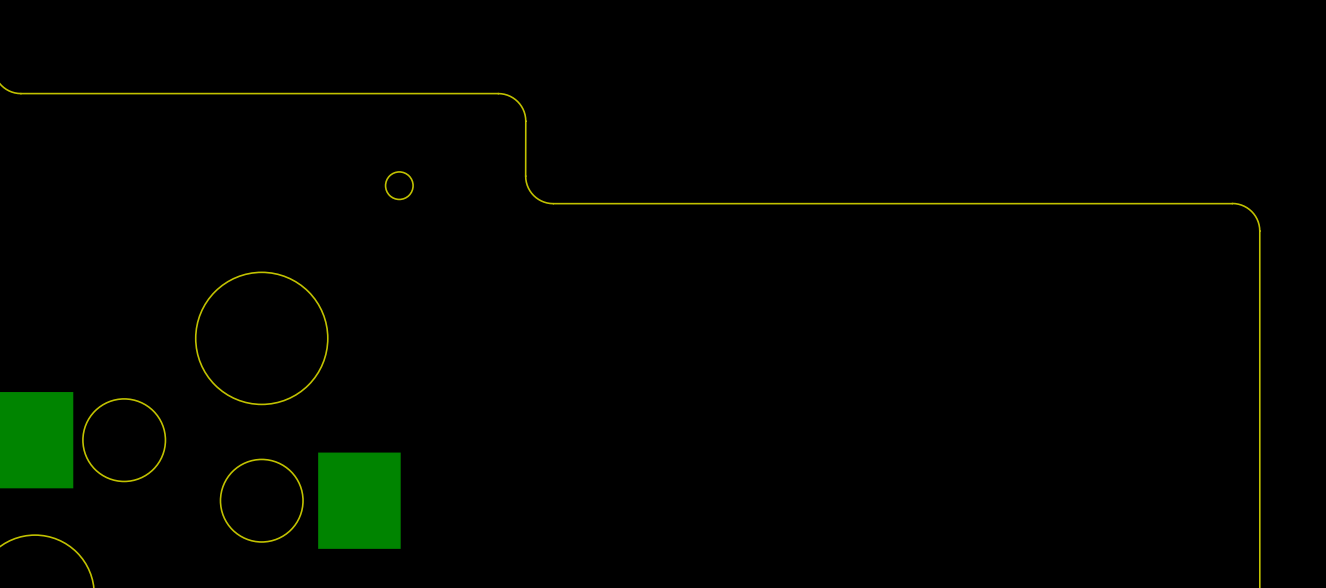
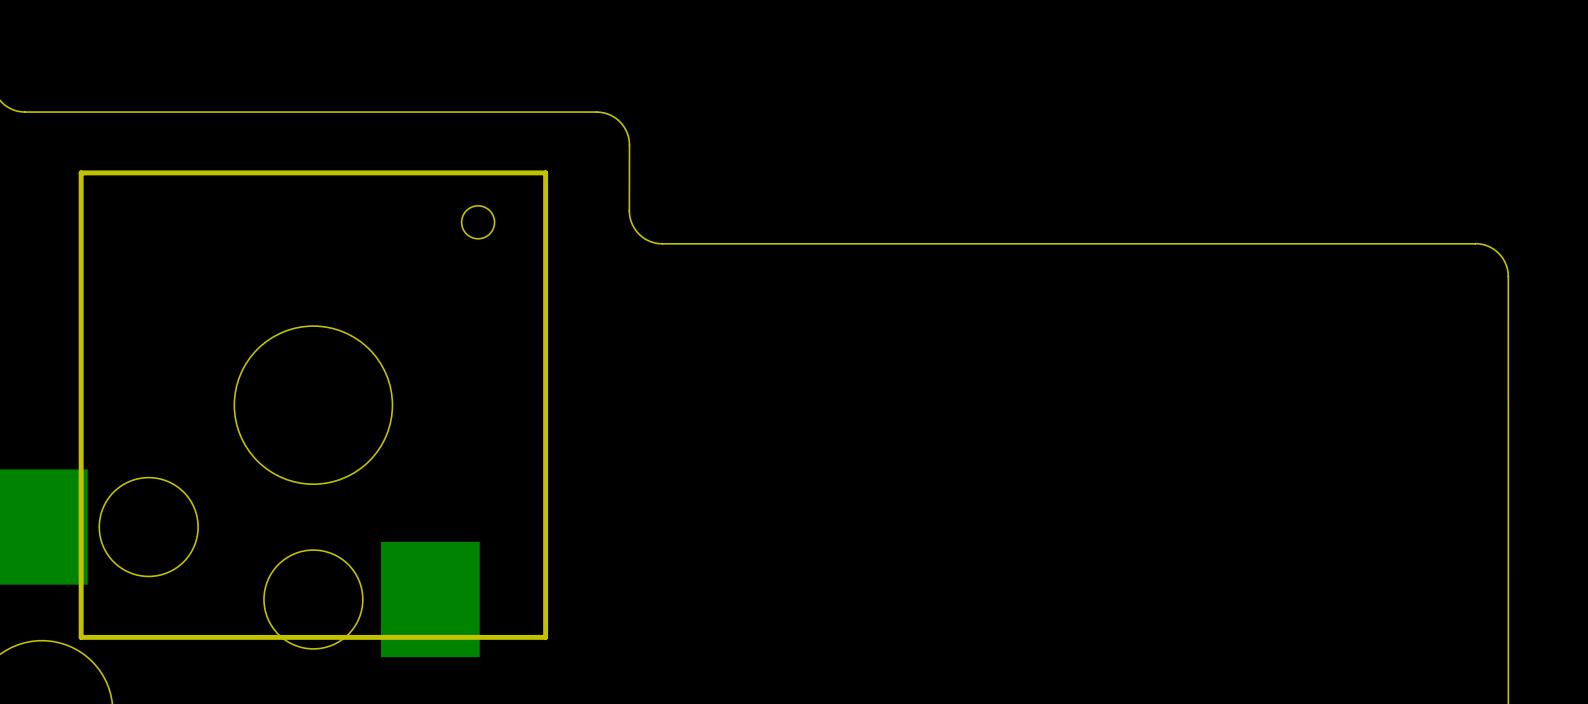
drawing: none -> [78, 170, 549, 640]

